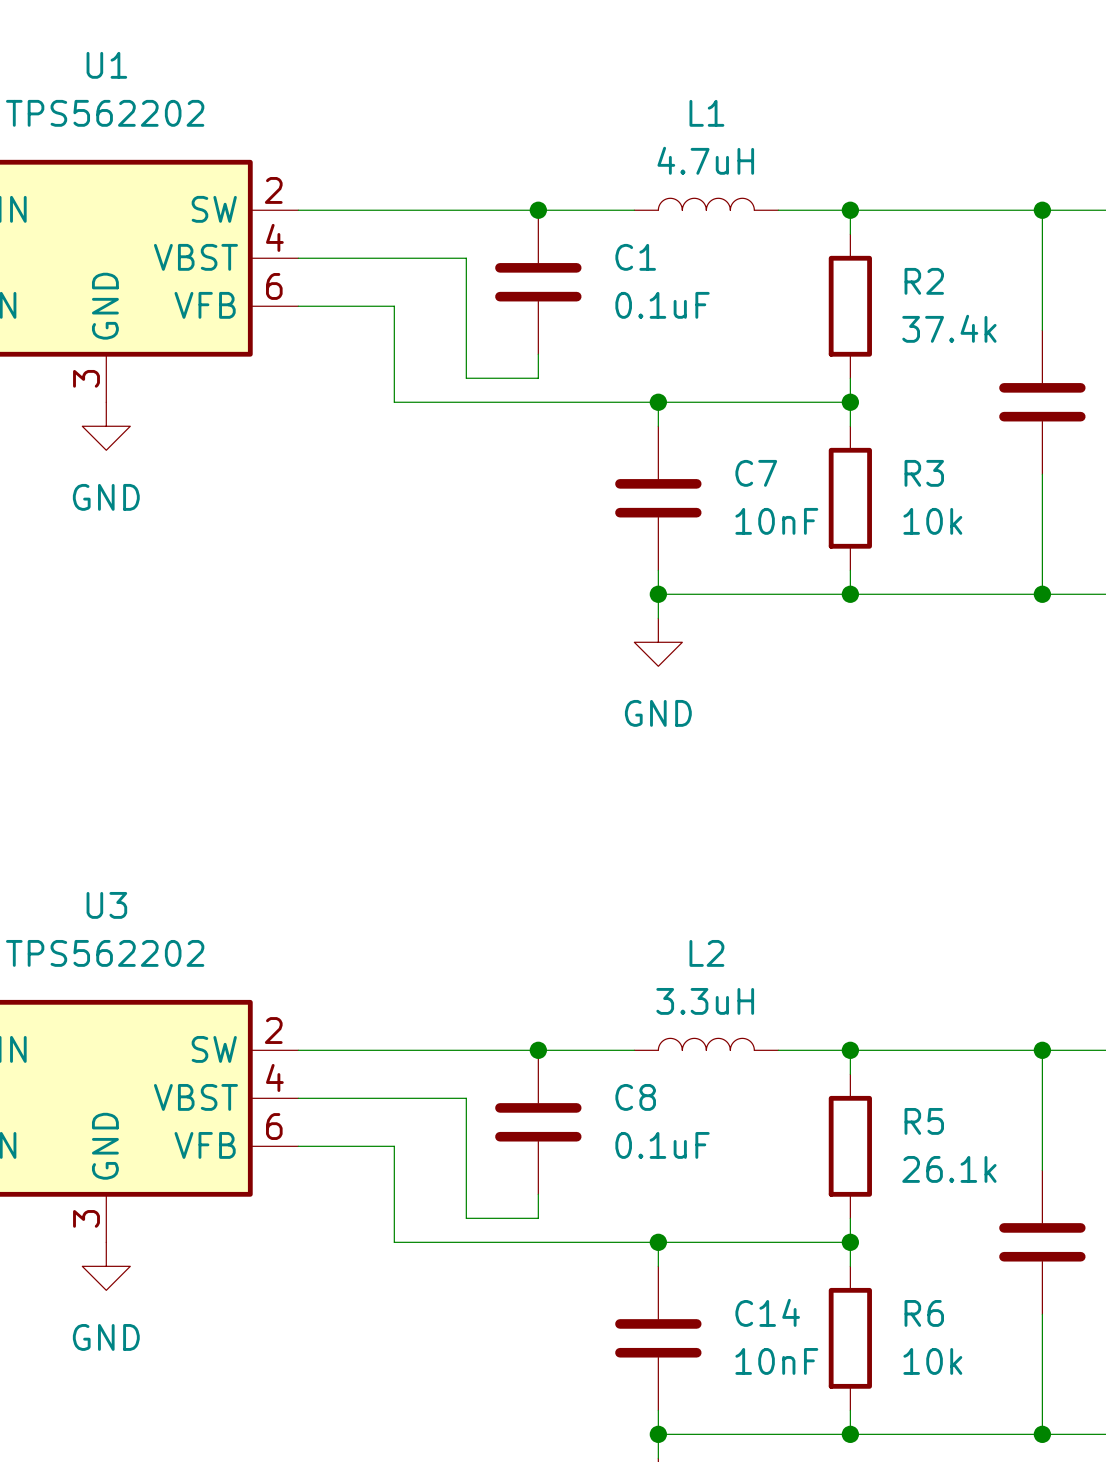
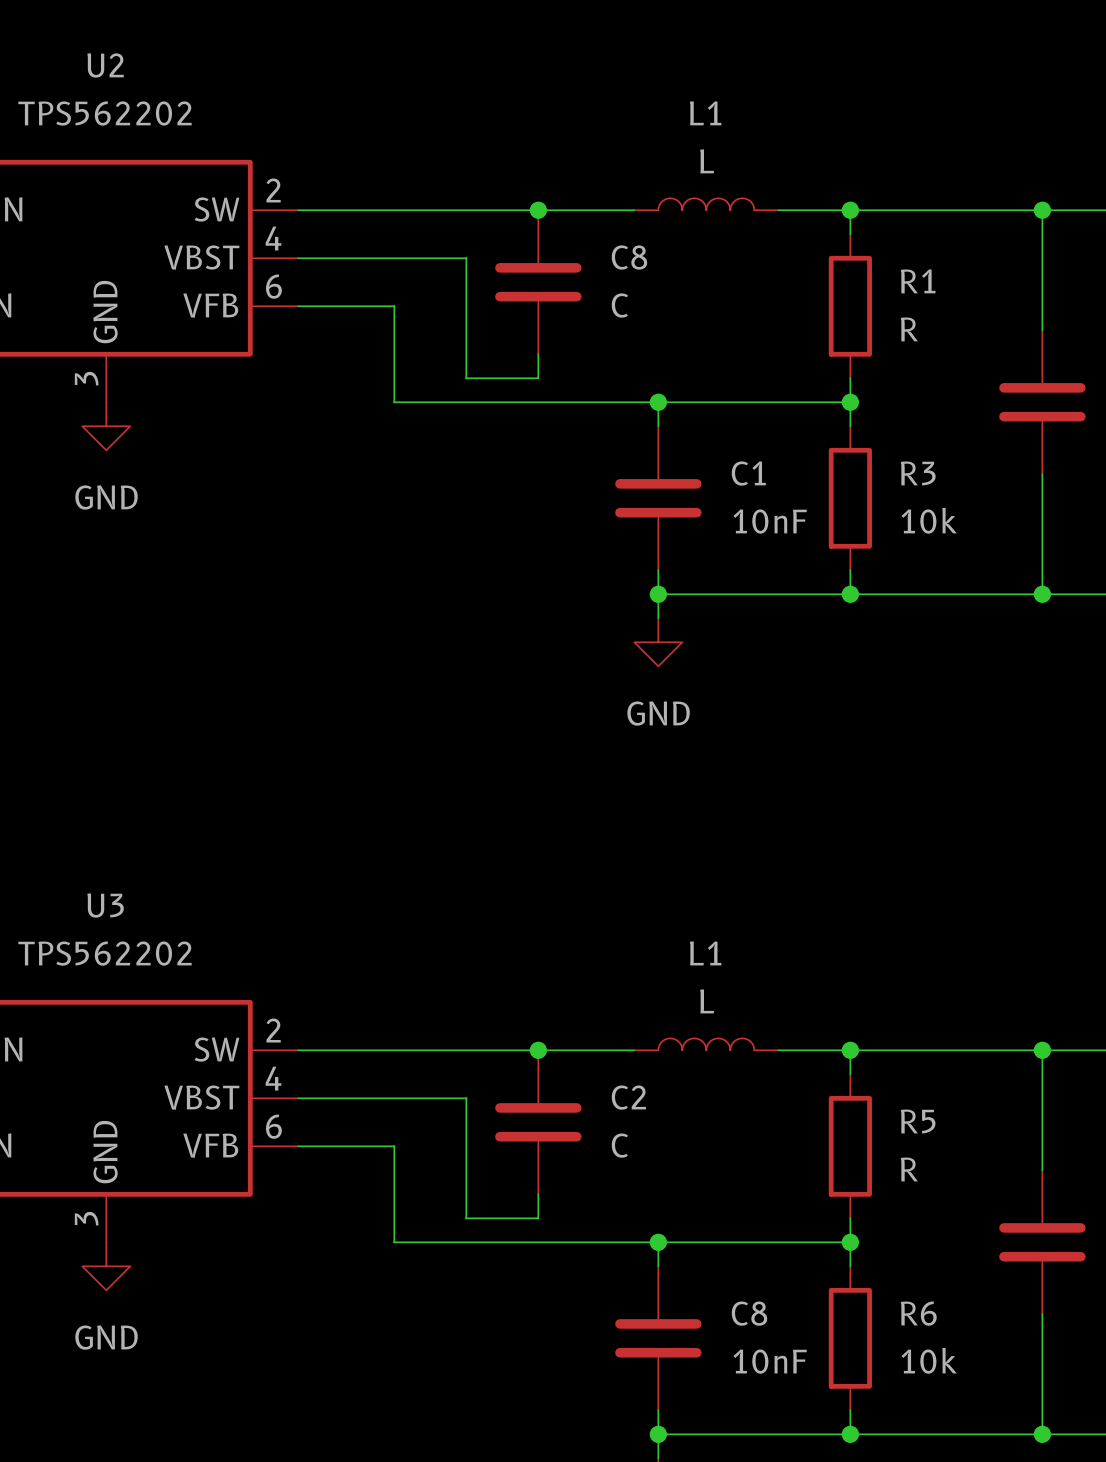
U1 name: U1 (106, 65) -> U2 (105, 65)
L1 value: 4.7uH (705, 160) -> L (707, 161)
C1 name: C1 (635, 257) -> C8 (629, 257)
R2 name: R2 (924, 281) -> R1 (918, 281)
C1 value: 0.1uF (662, 305) -> C (619, 305)
R2 value: 37.4k (949, 328) -> R (909, 329)
C7 name: C7 (756, 473) -> C1 (748, 473)
L2 name: L2 (706, 953) -> L1 (705, 953)
L2 value: 3.3uH (705, 1001) -> L (707, 1001)
C8 name: C8 (635, 1097) -> C2 (628, 1097)
C8 value: 0.1uF (662, 1145) -> C (619, 1145)
R5 value: 26.1k (949, 1169) -> R (909, 1169)
C14 name: C14 (767, 1312) -> C8 (749, 1313)

